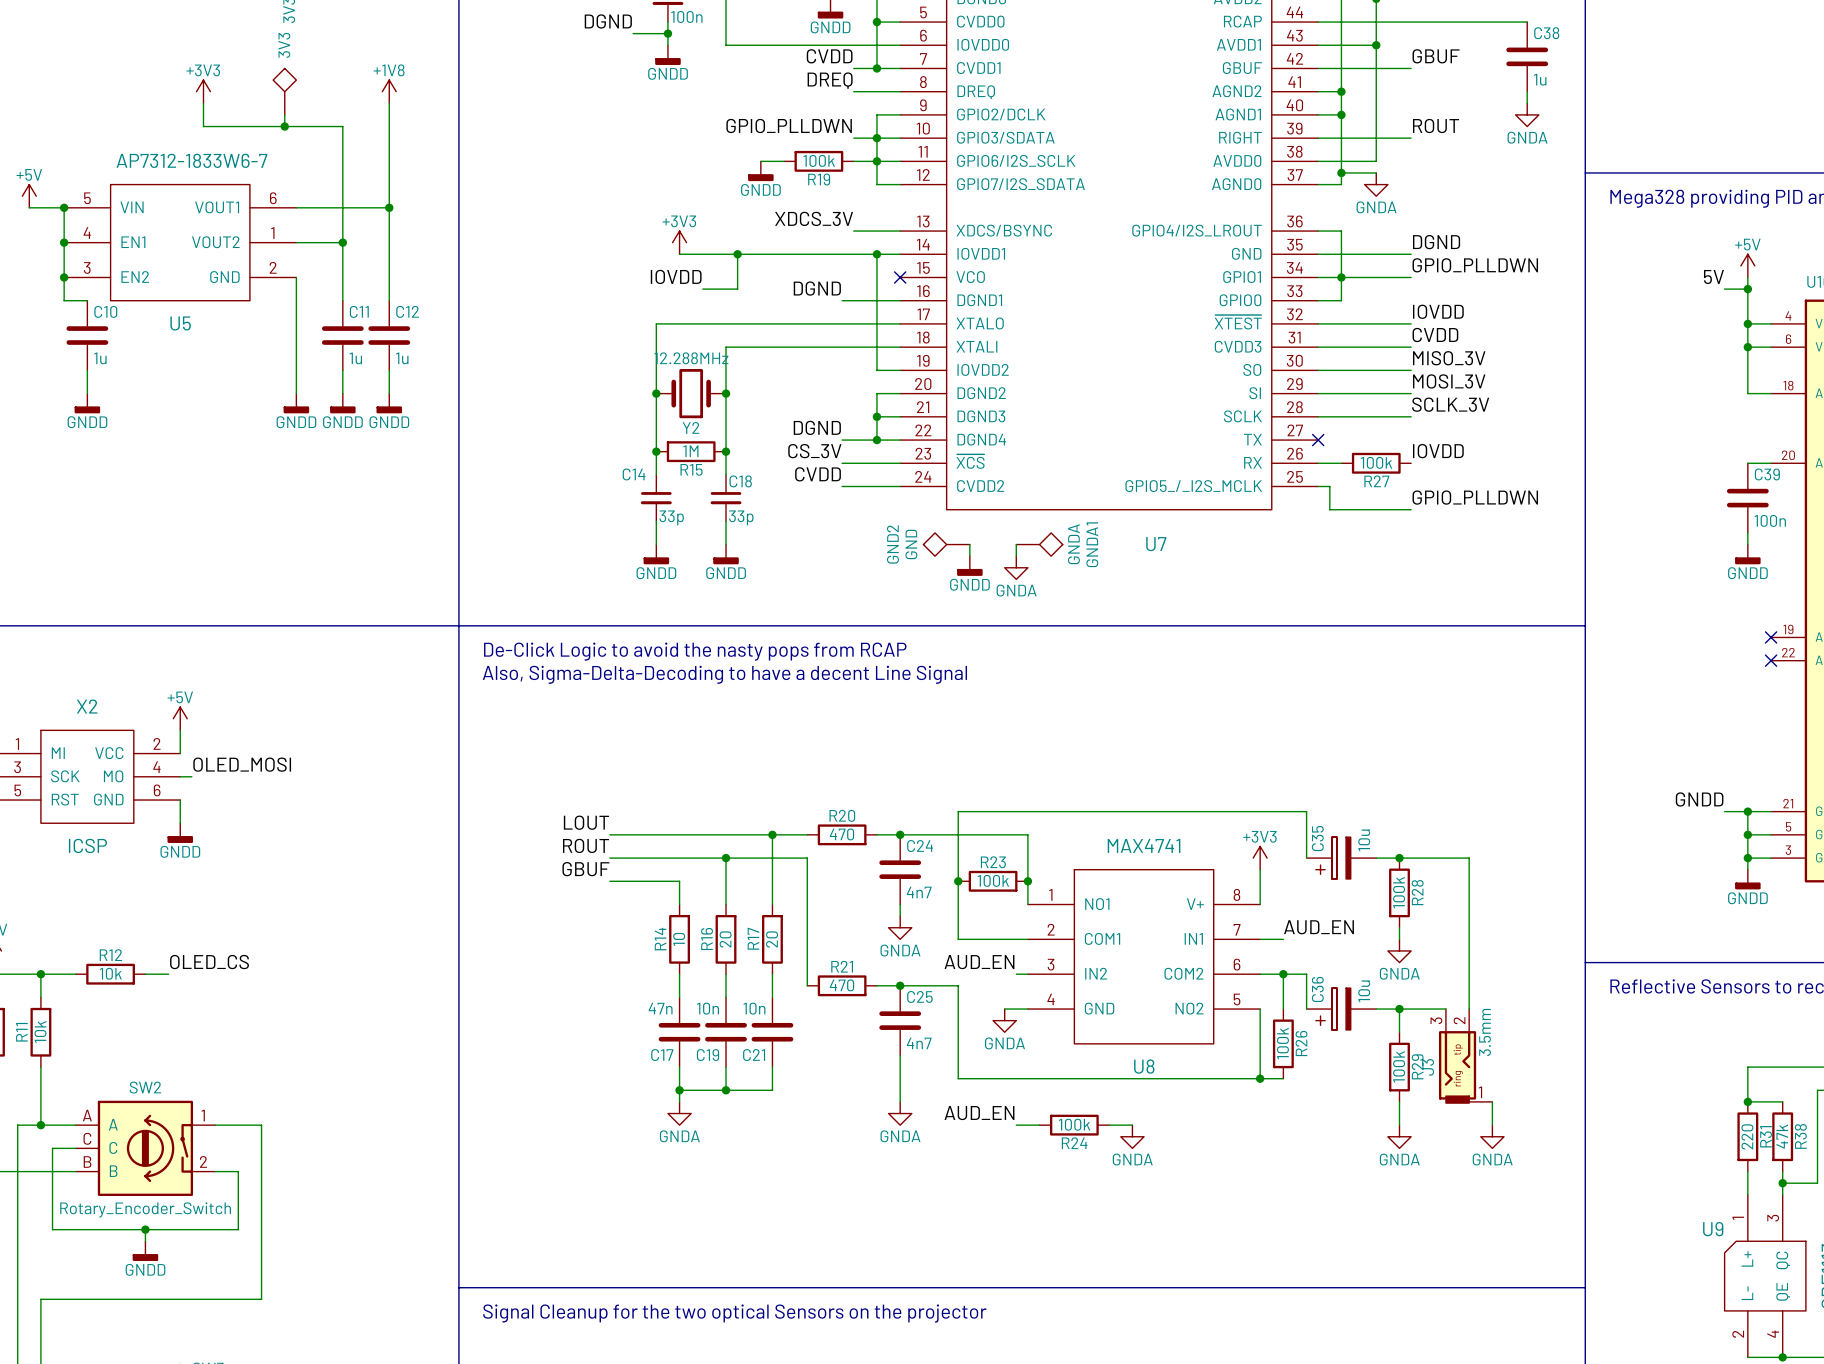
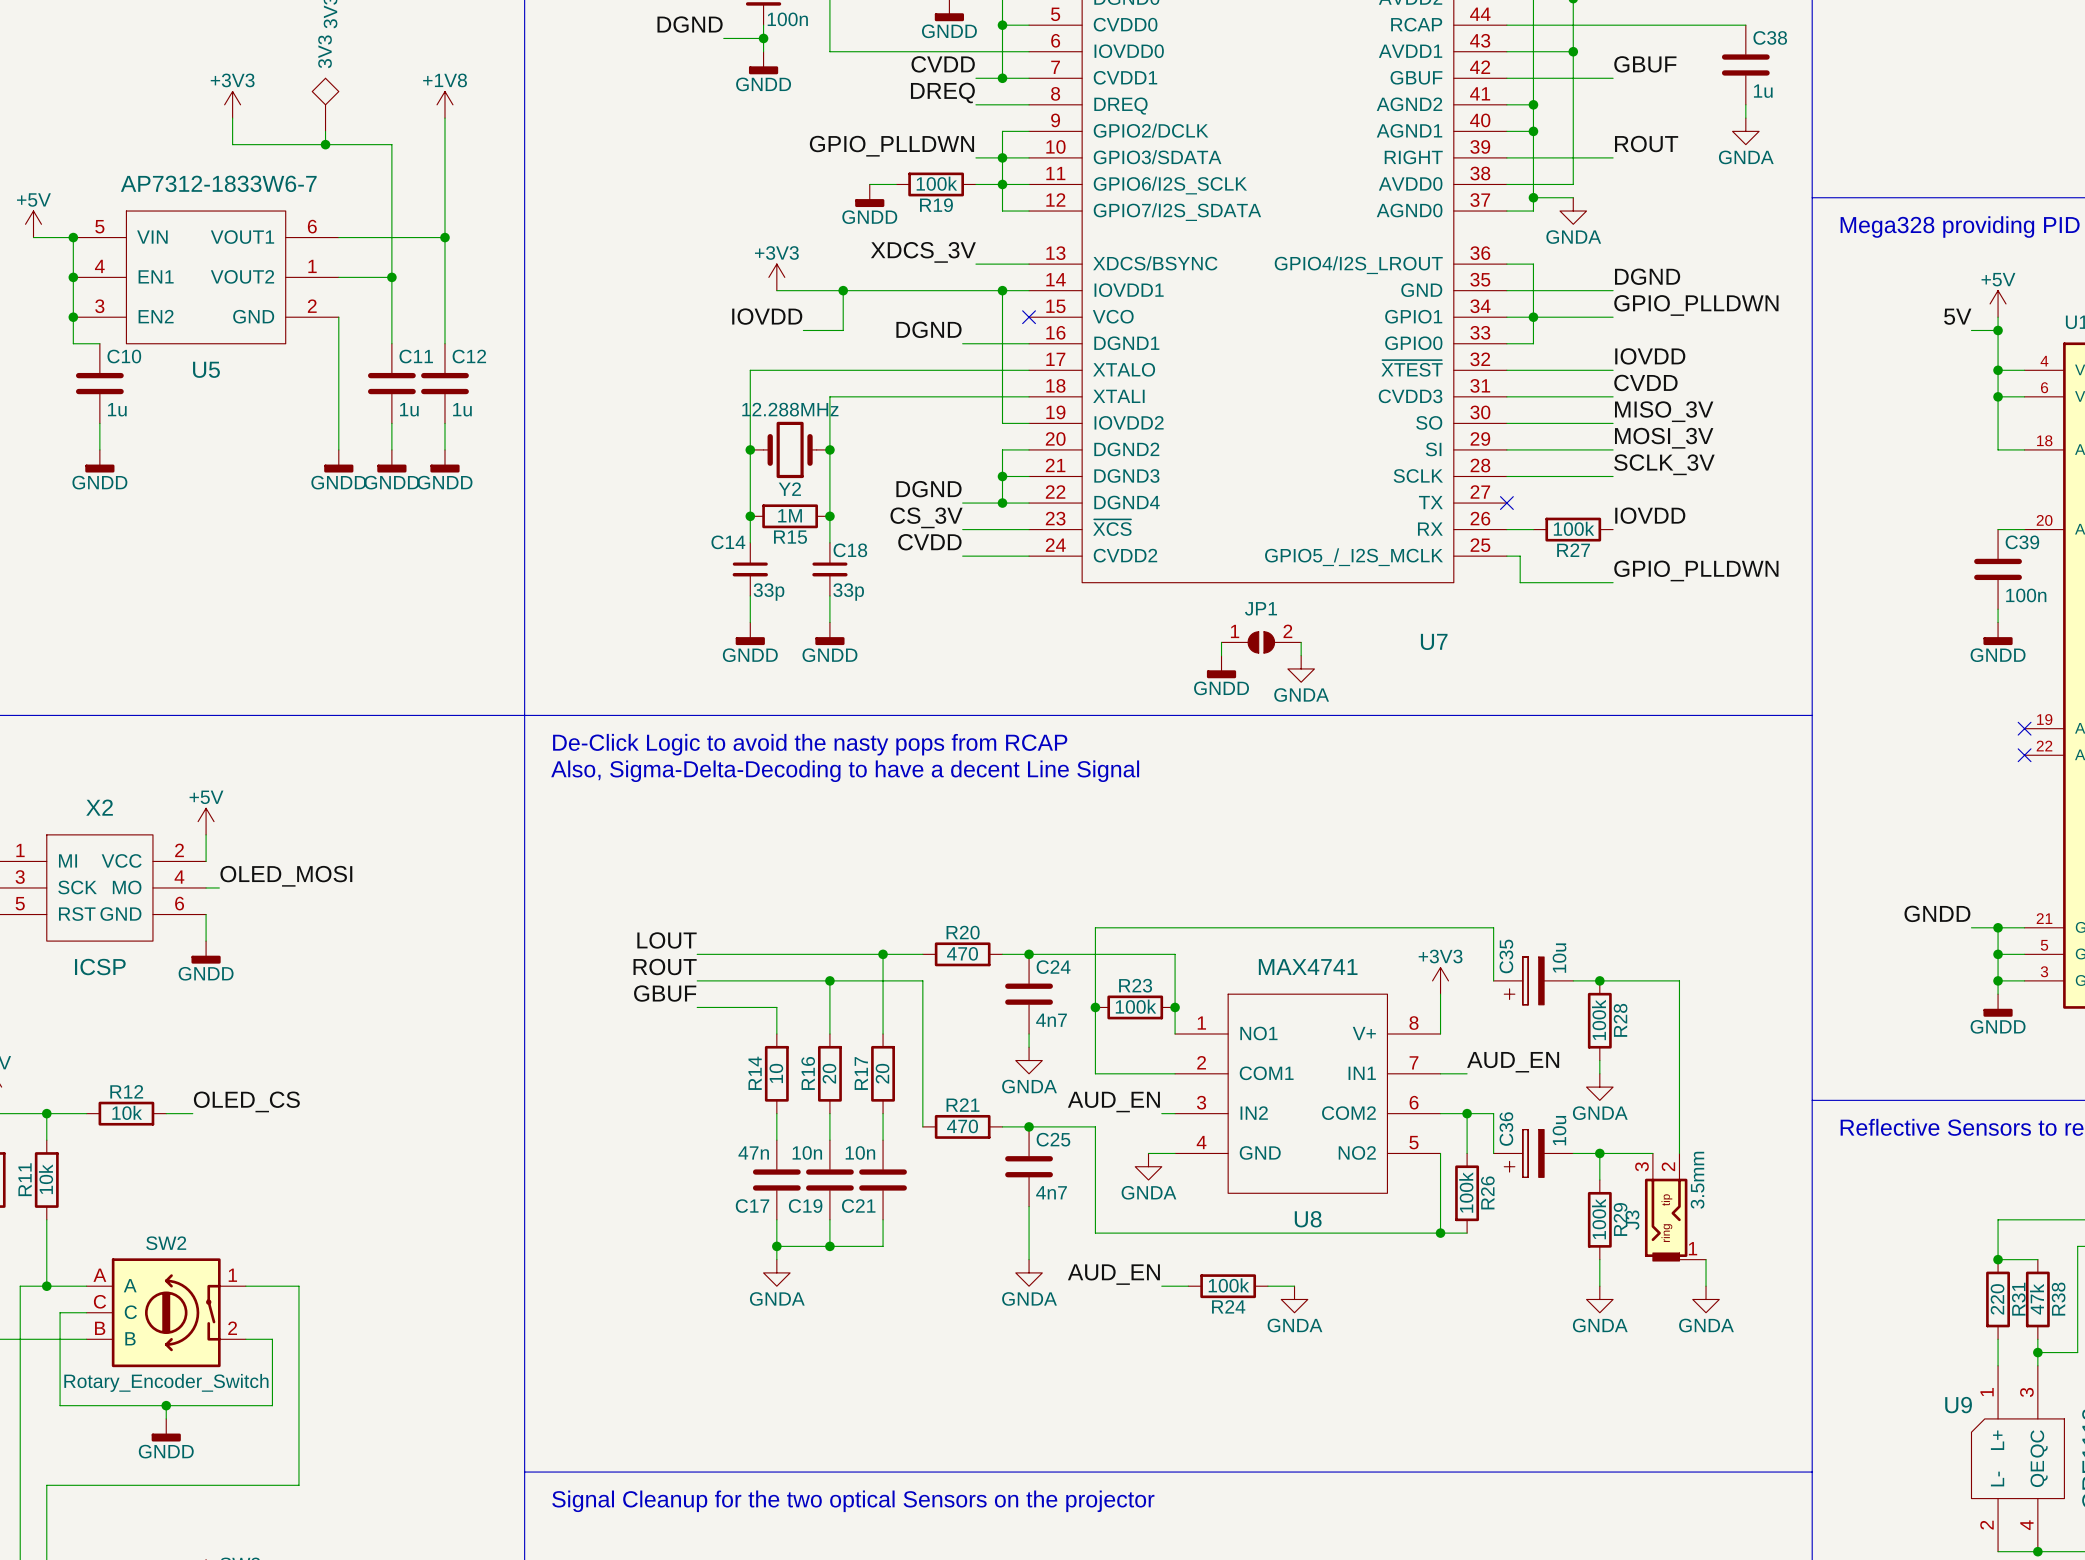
GND2: GND (946, 544) -> none
wire: (969, 544) (969, 556) -> (1301, 642) (1301, 655)
wire: (1016, 544) (1016, 556) -> (1221, 642) (1221, 655)
GNDA1: GNDA (1039, 544) -> none
U7 name position: U7 (1156, 544) -> U7 (1434, 641)
JP1: none -> (1261, 642)
power symbol position: GNDD (969, 566) -> GNDD (1221, 666)
power symbol position: GNDA (1016, 567) -> GNDA (1301, 668)

